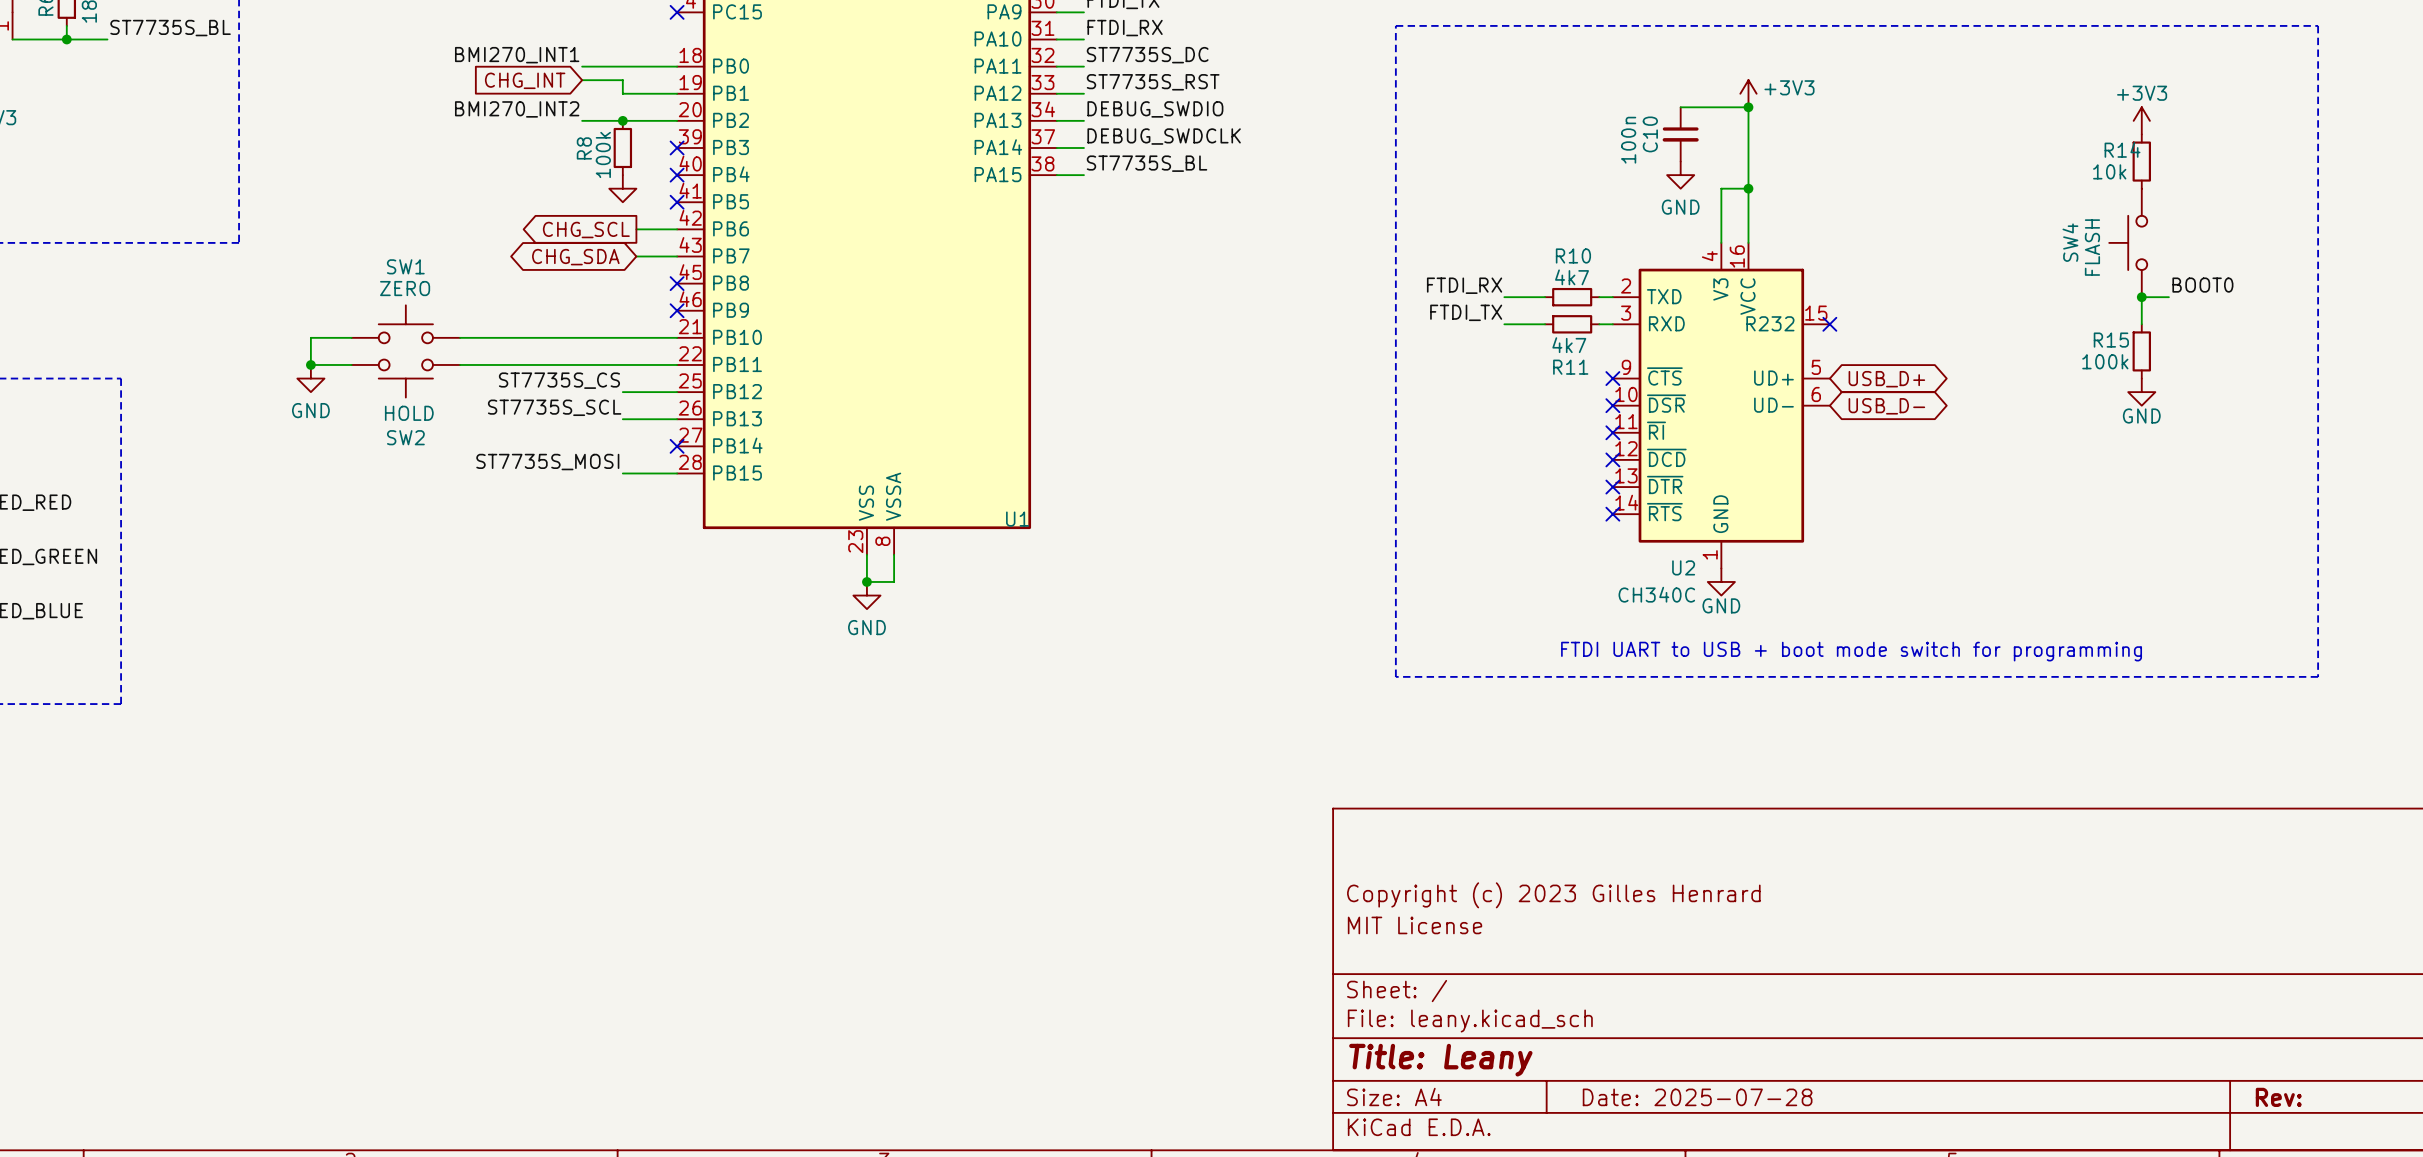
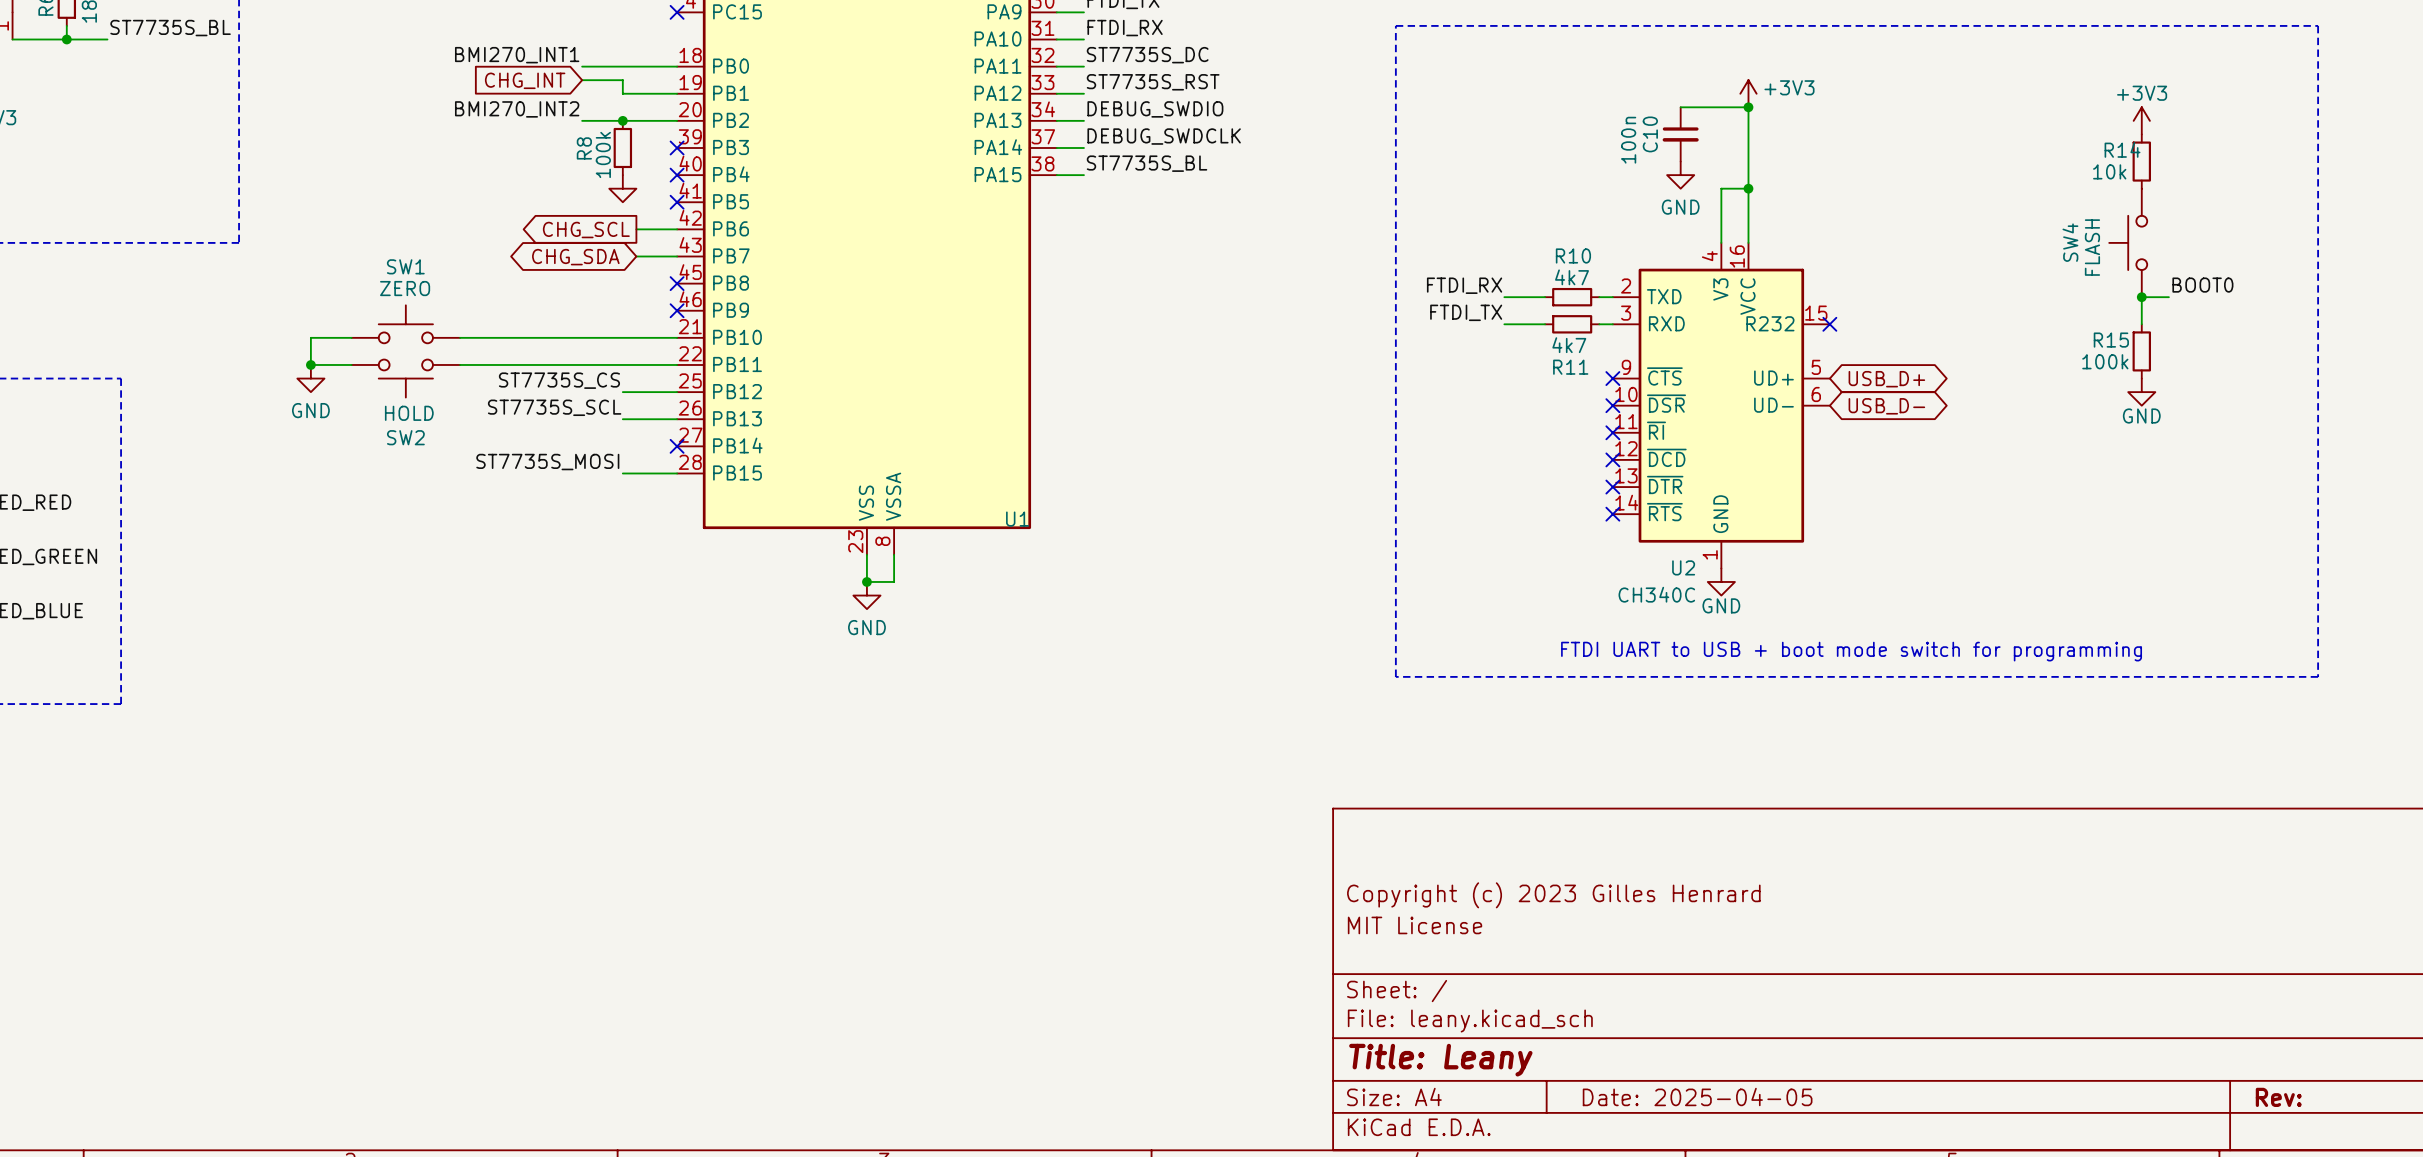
title block: Date: 2025-07-28 (1697, 1097) -> Date: 2025-04-05 (1697, 1096)

